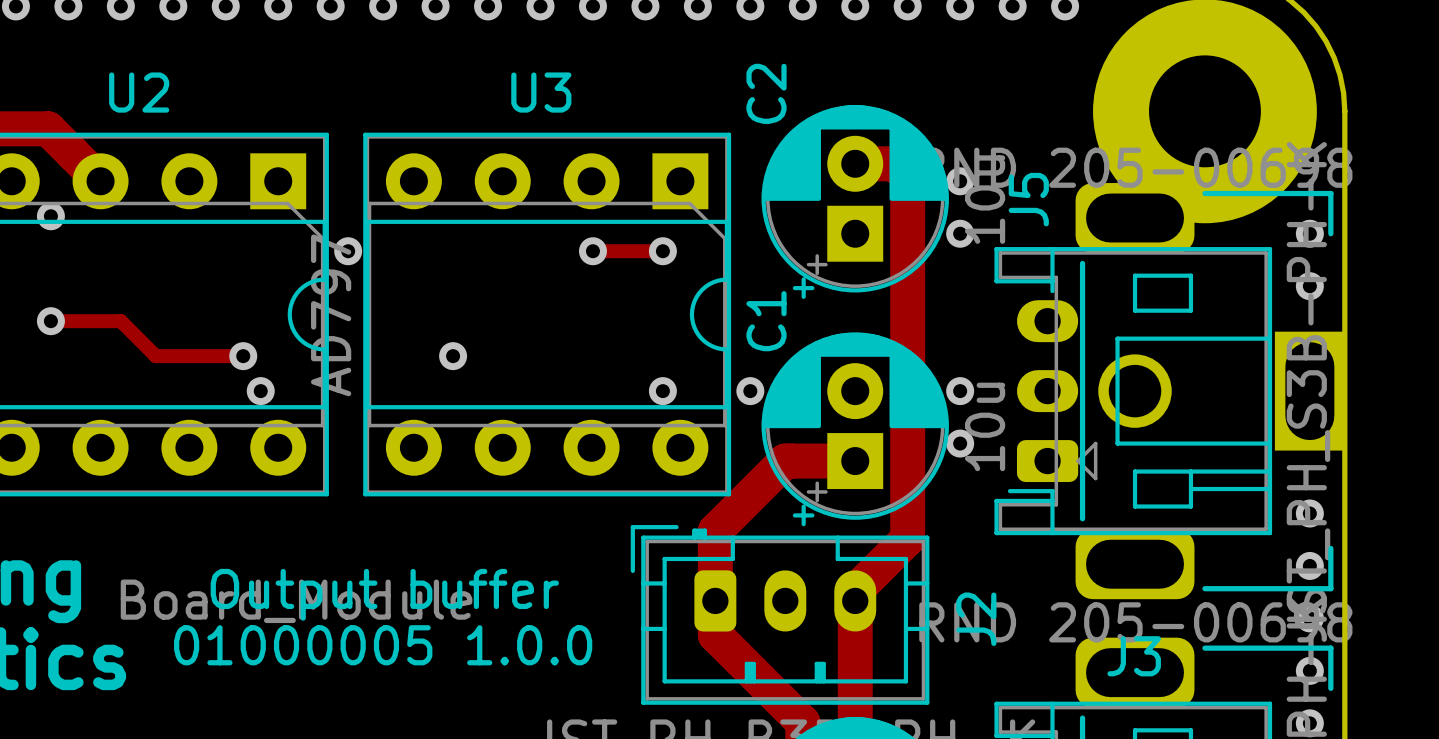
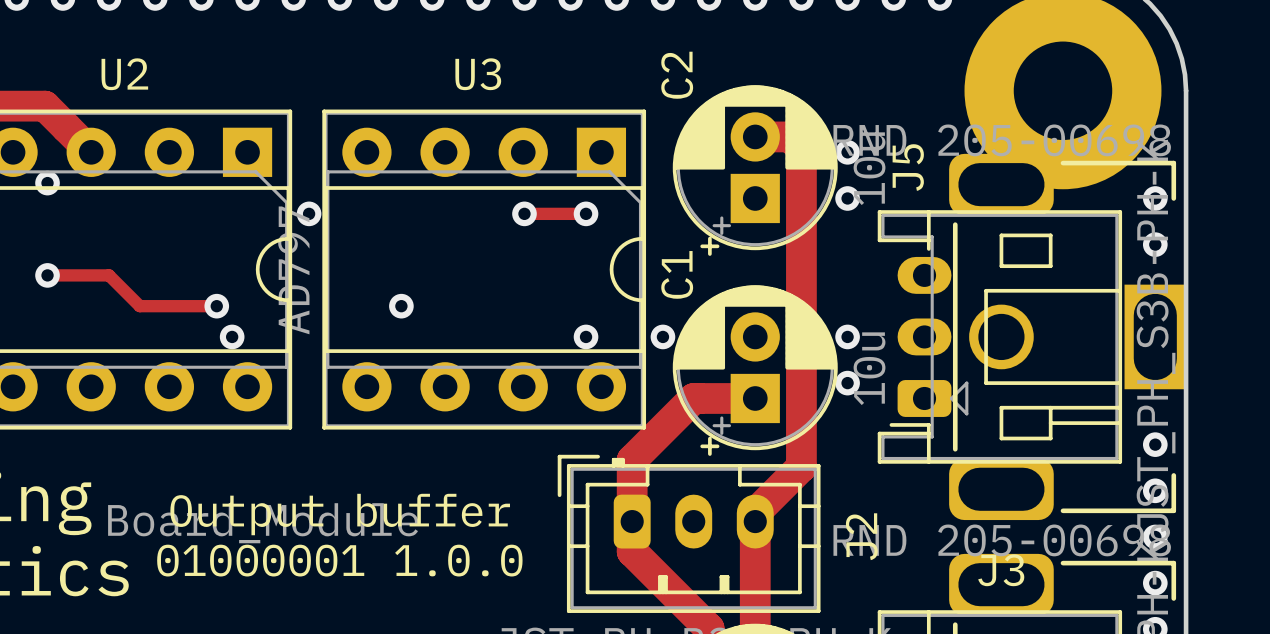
text: 01000005 1.0.0 (383, 645) -> 01000001 1.0.0 (339, 560)

